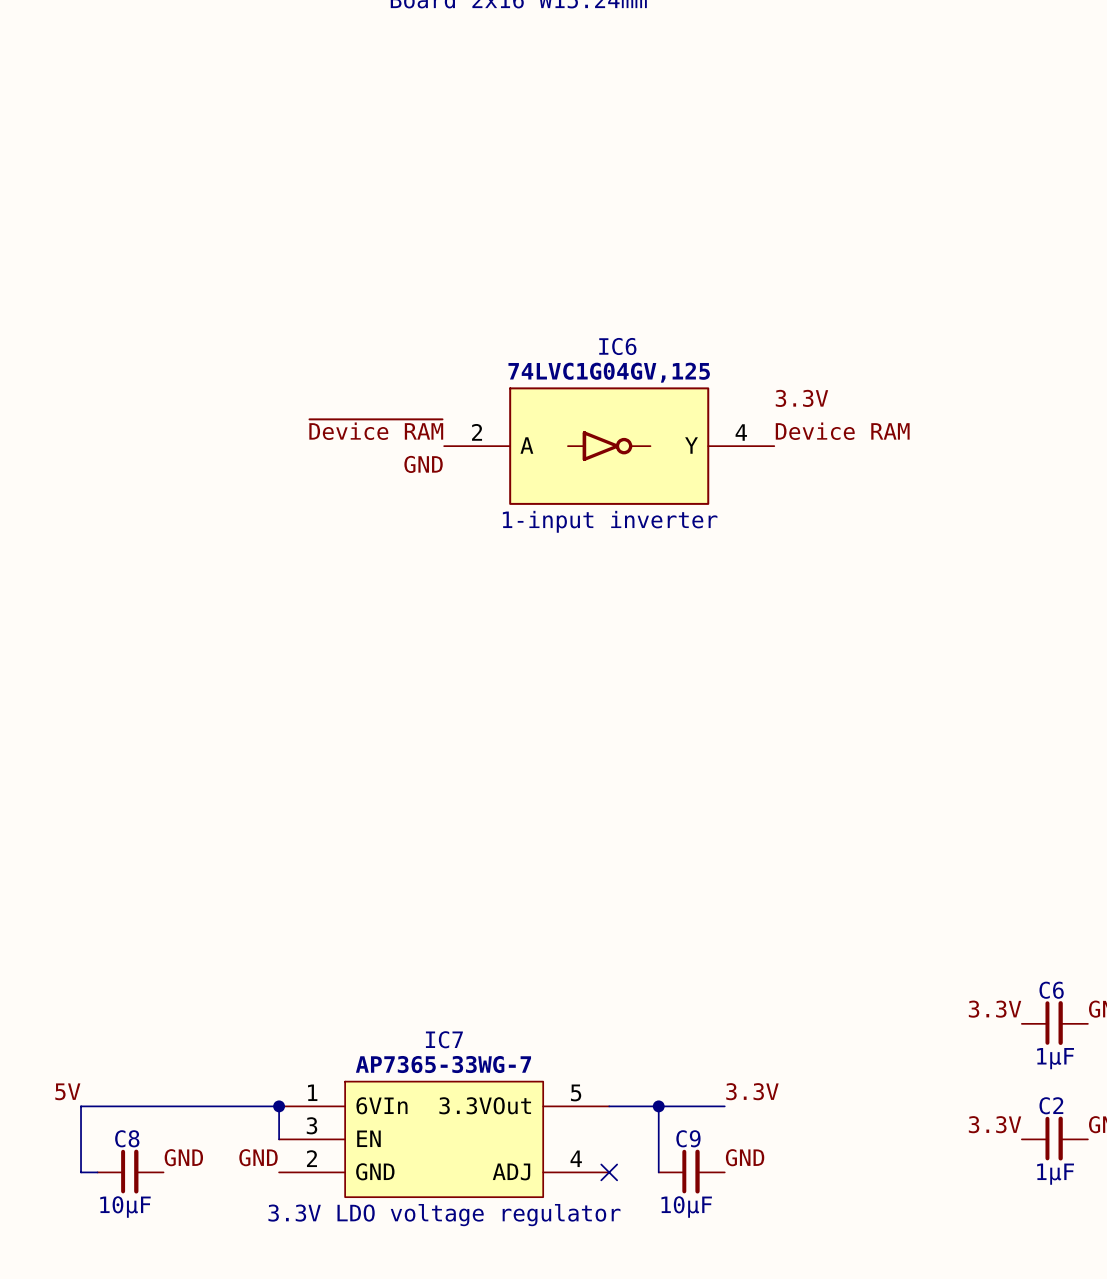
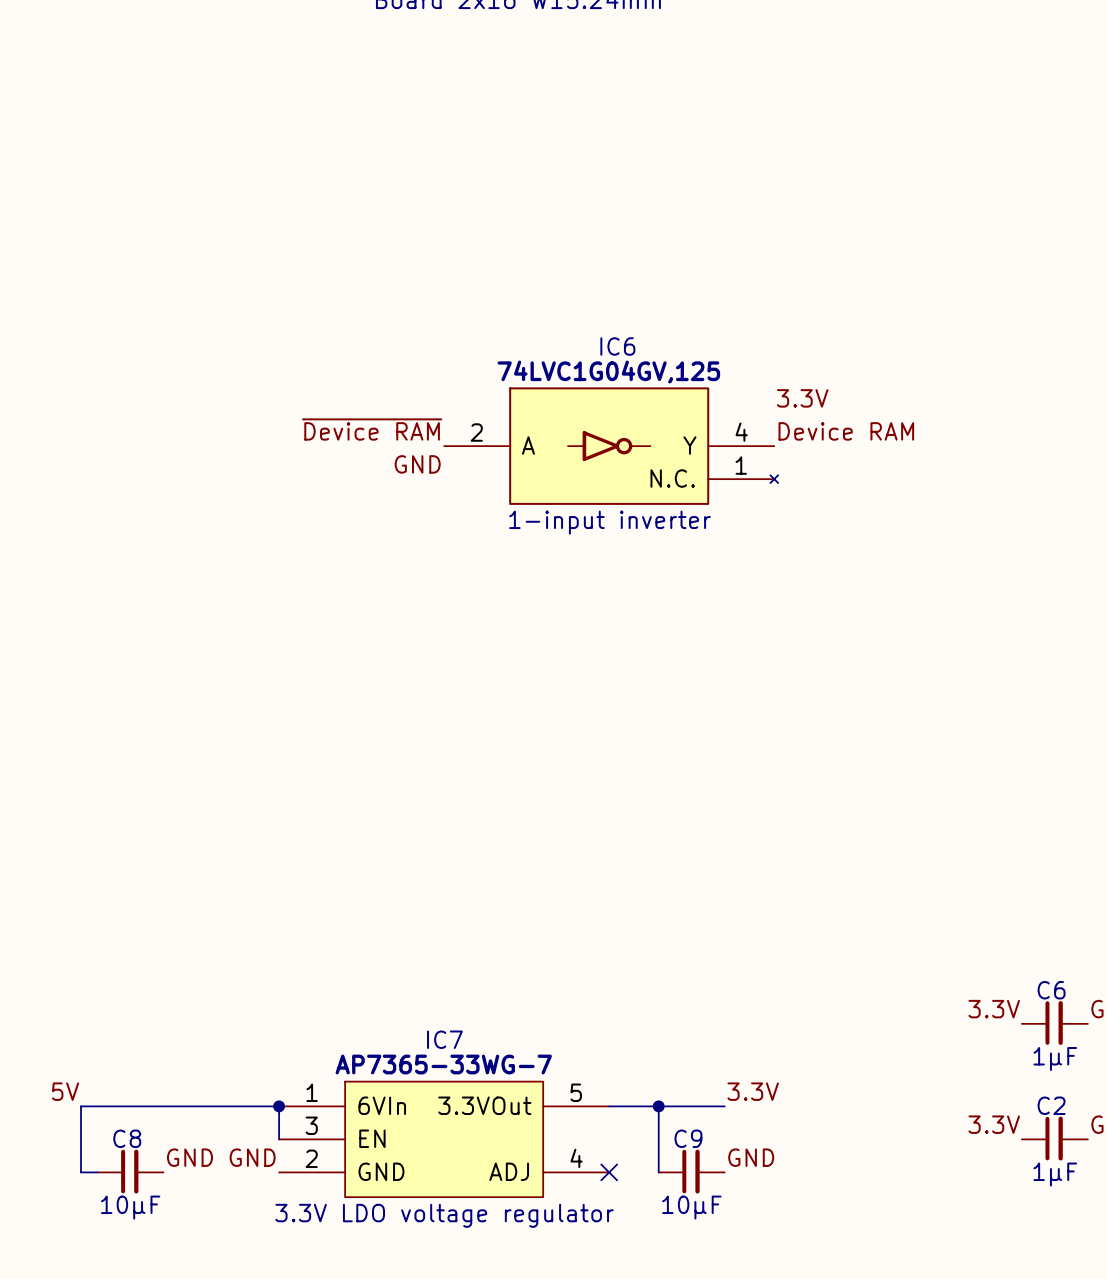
IC6 symbol: [444, 387, 775, 505] -> [444, 387, 779, 505]

